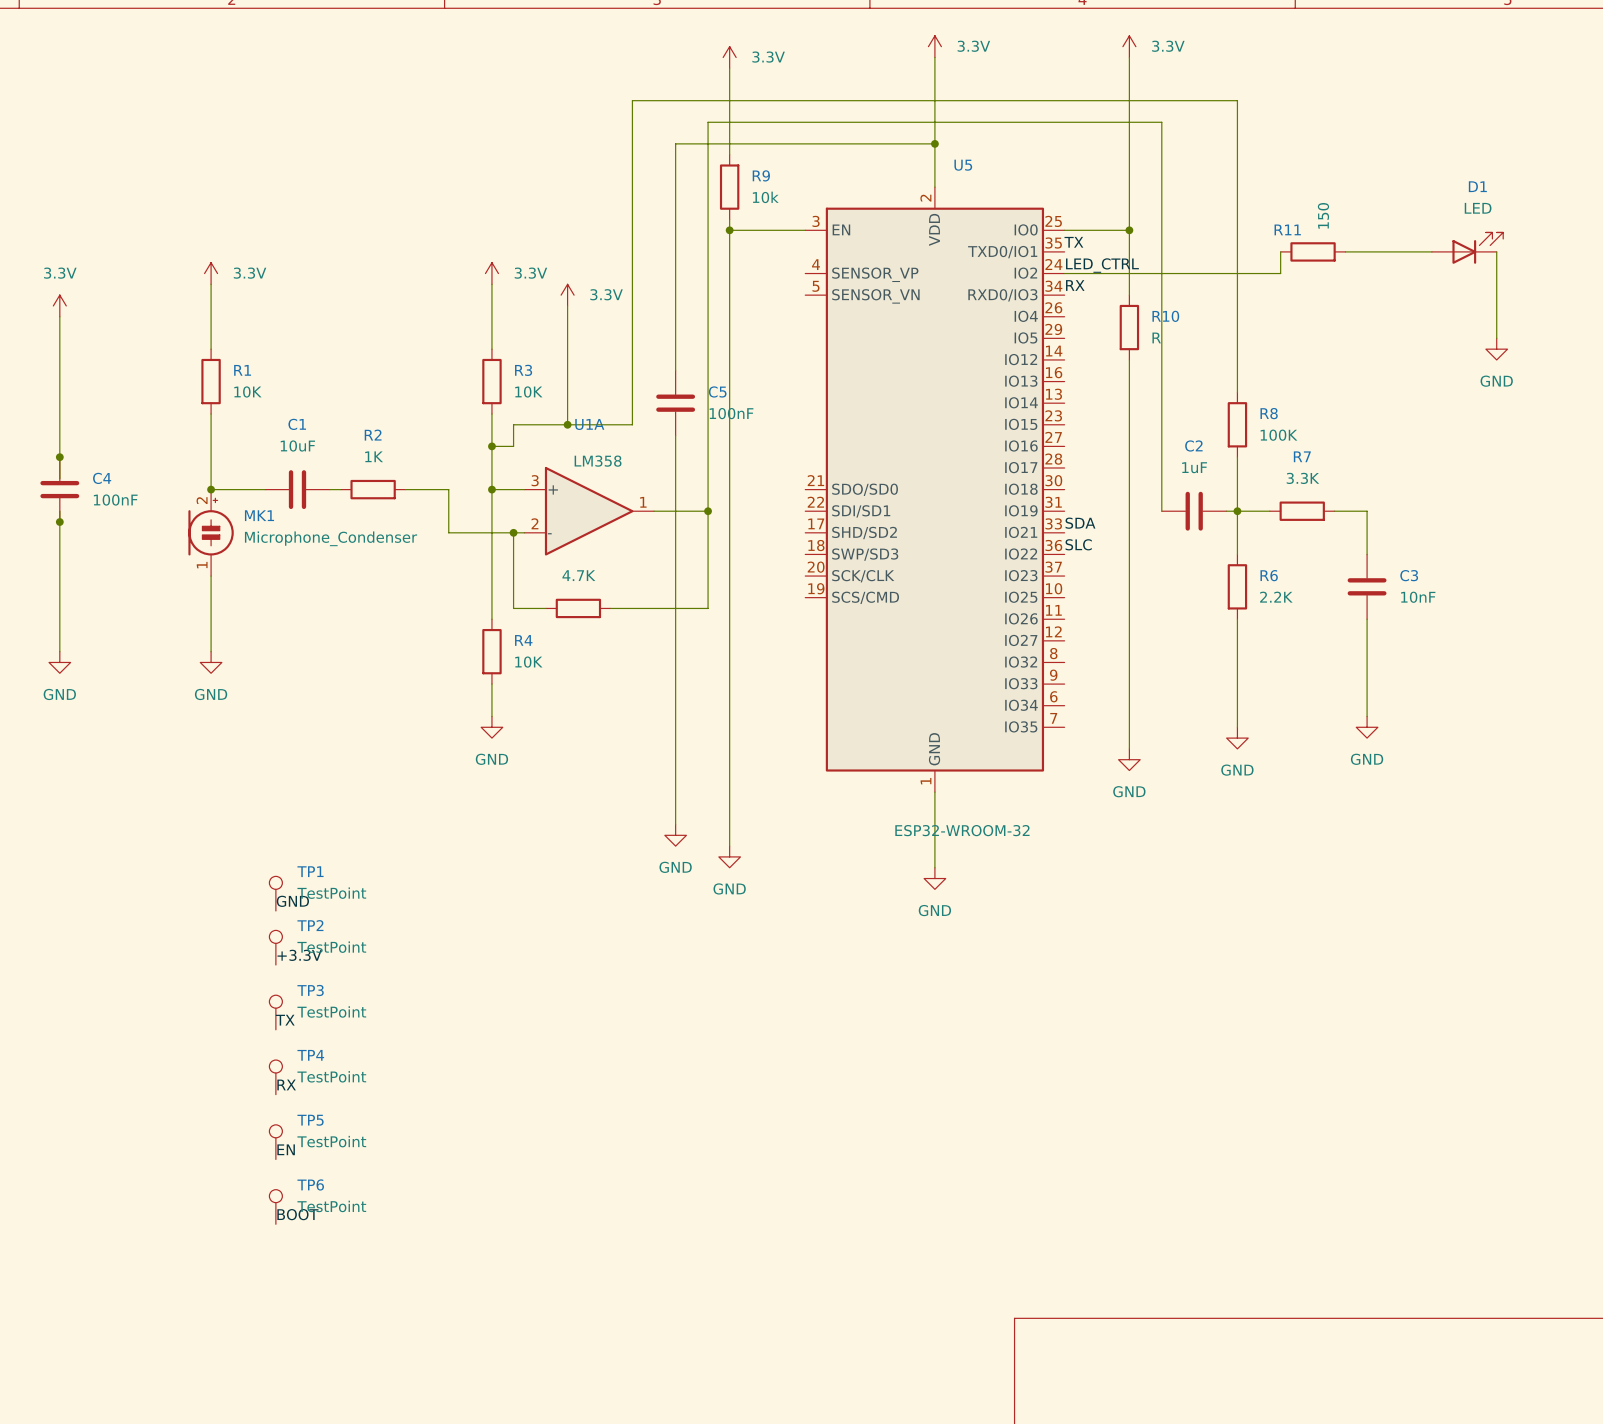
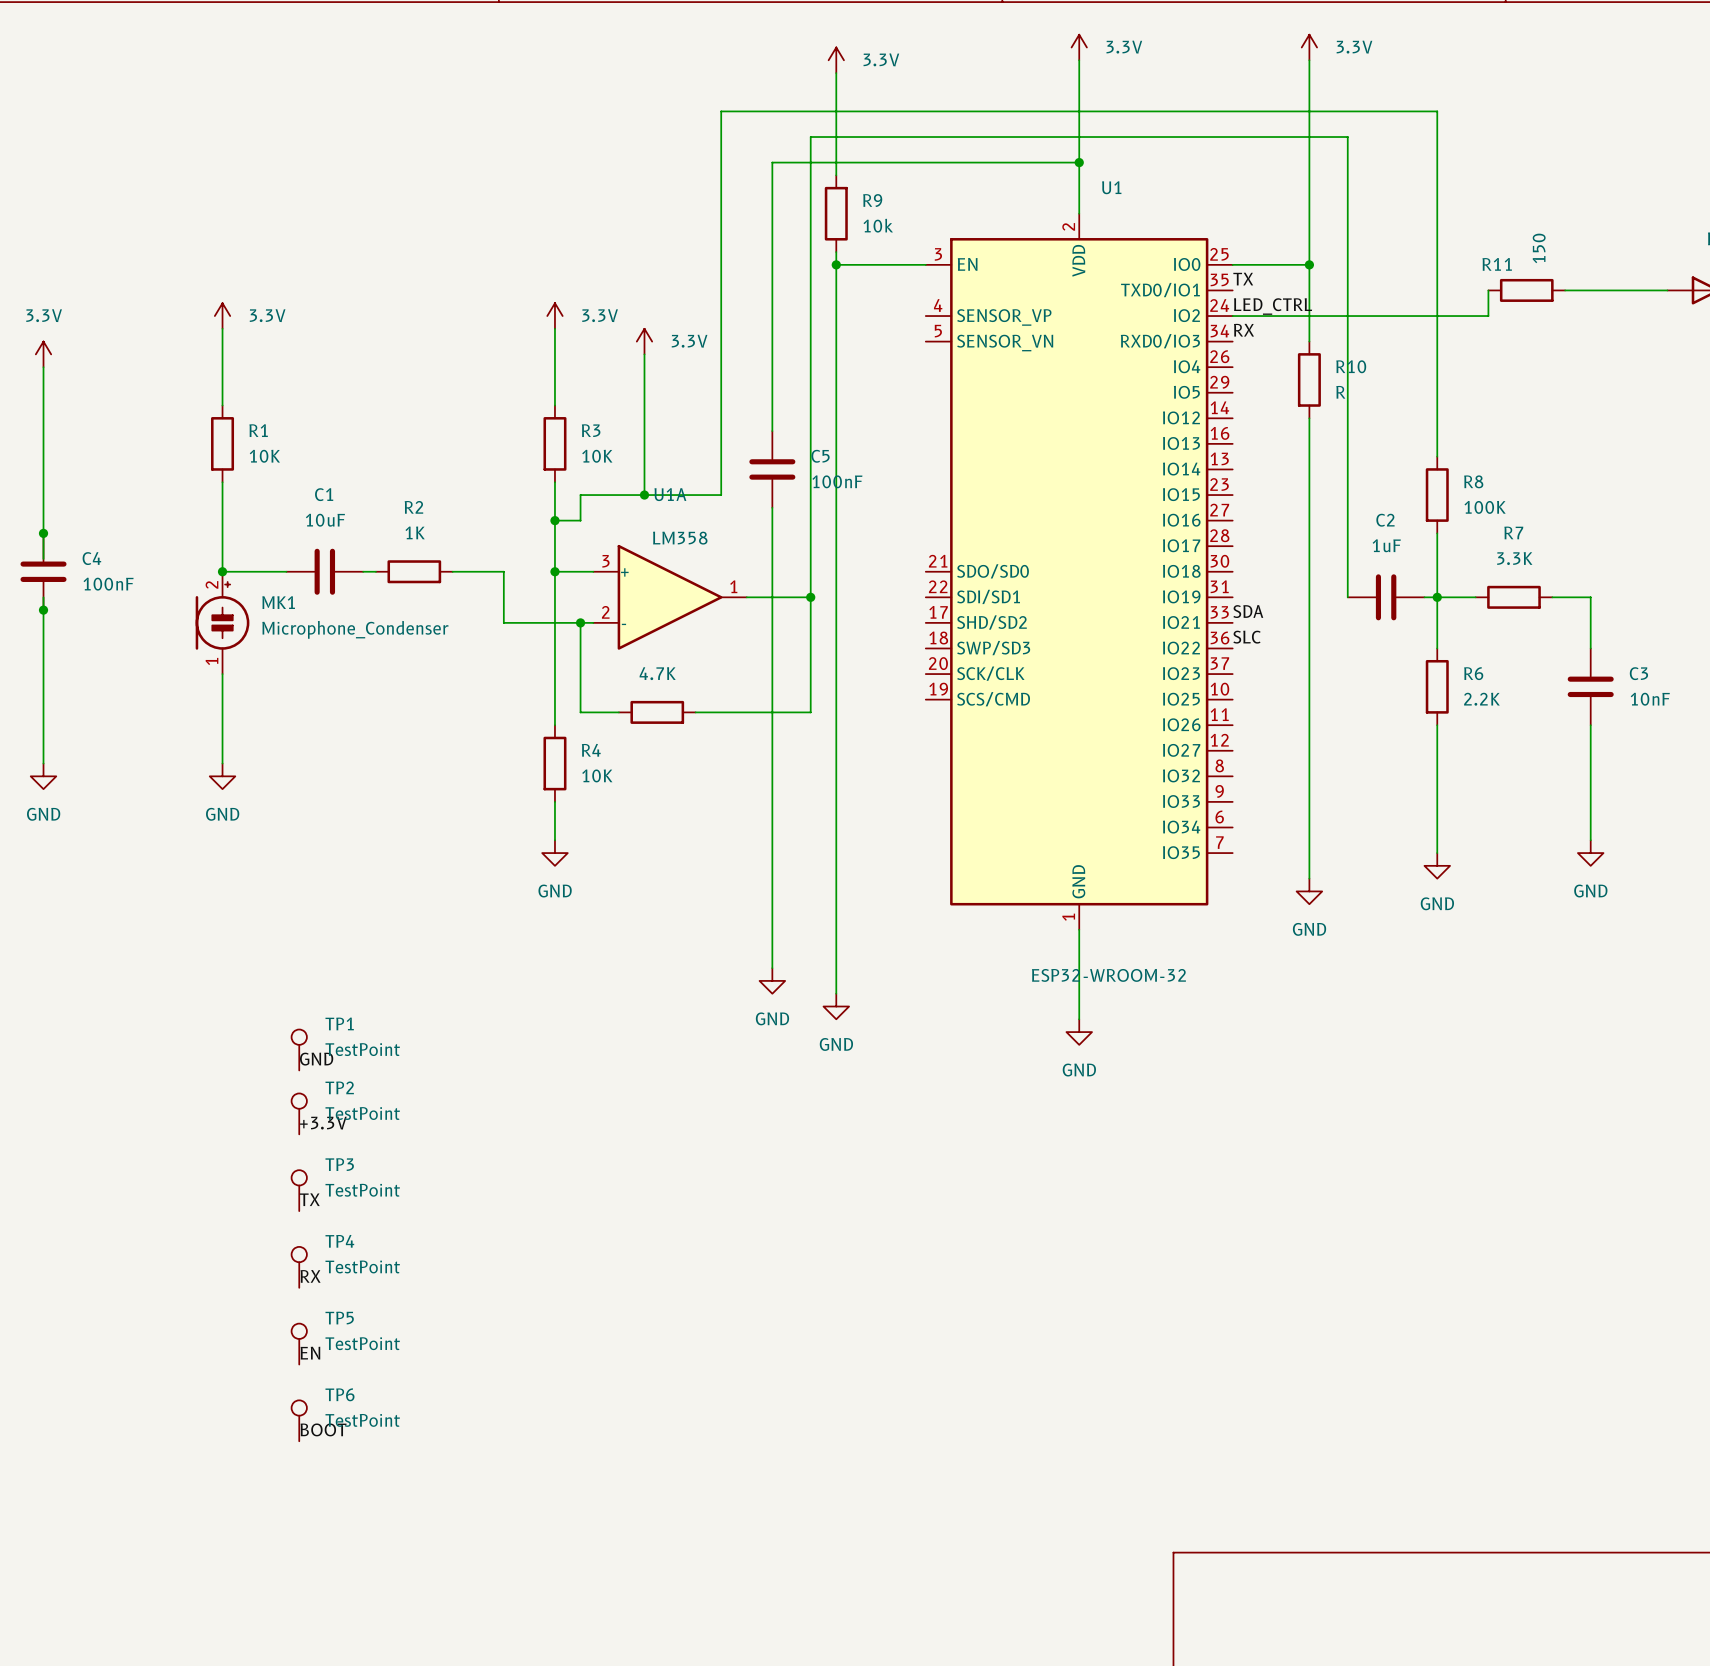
U5 name: U5 (963, 165) -> U1 (1111, 187)

